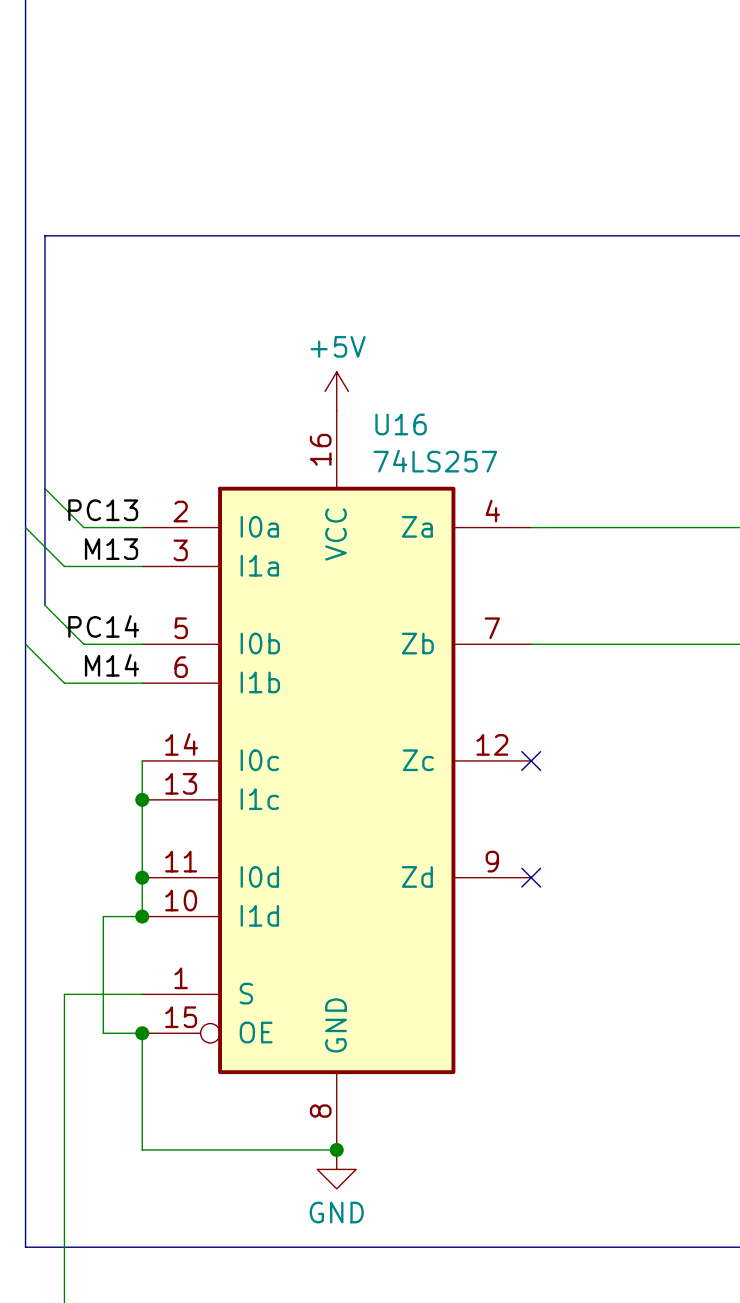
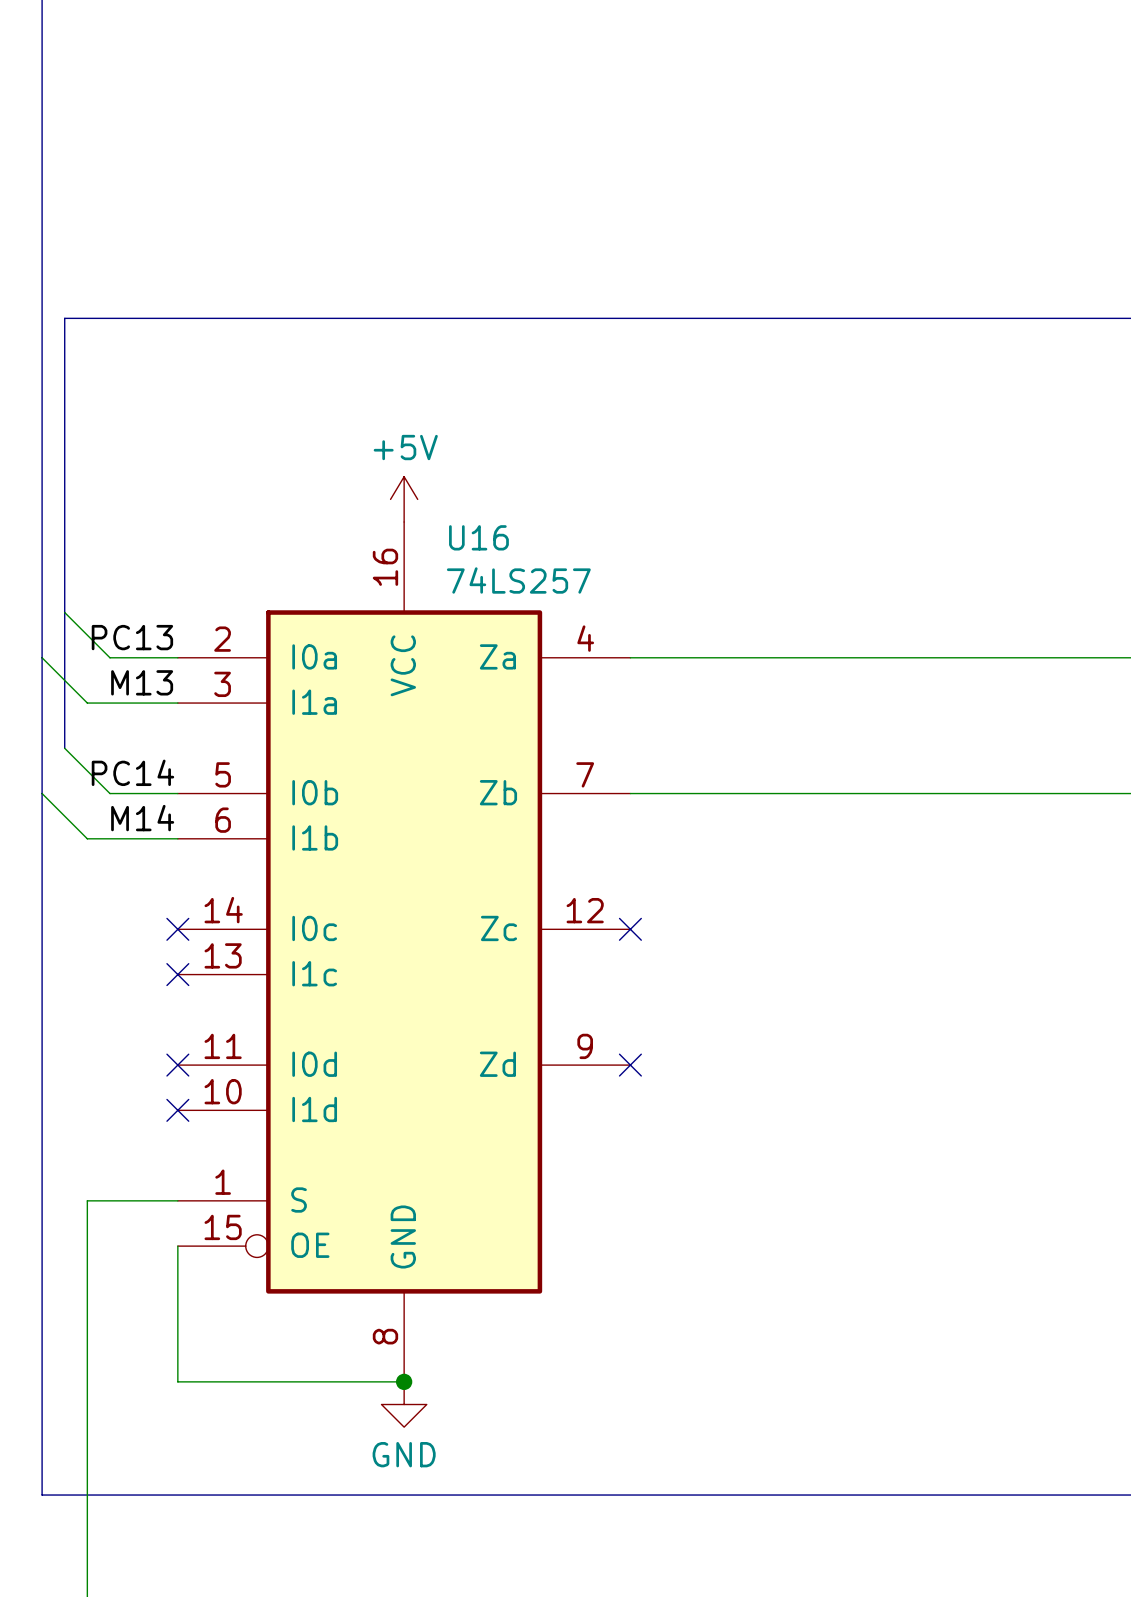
wire: (142, 760) (142, 916) (103, 916) (103, 1033) (142, 1033) -> none
no-connect mark: none -> (177, 929)
junction: (142, 799) -> none
no-connect mark: none -> (177, 974)
junction: (142, 877) -> none
no-connect mark: none -> (177, 1065)
junction: (142, 916) -> none
no-connect mark: none -> (177, 1110)
junction: (142, 1033) -> none

